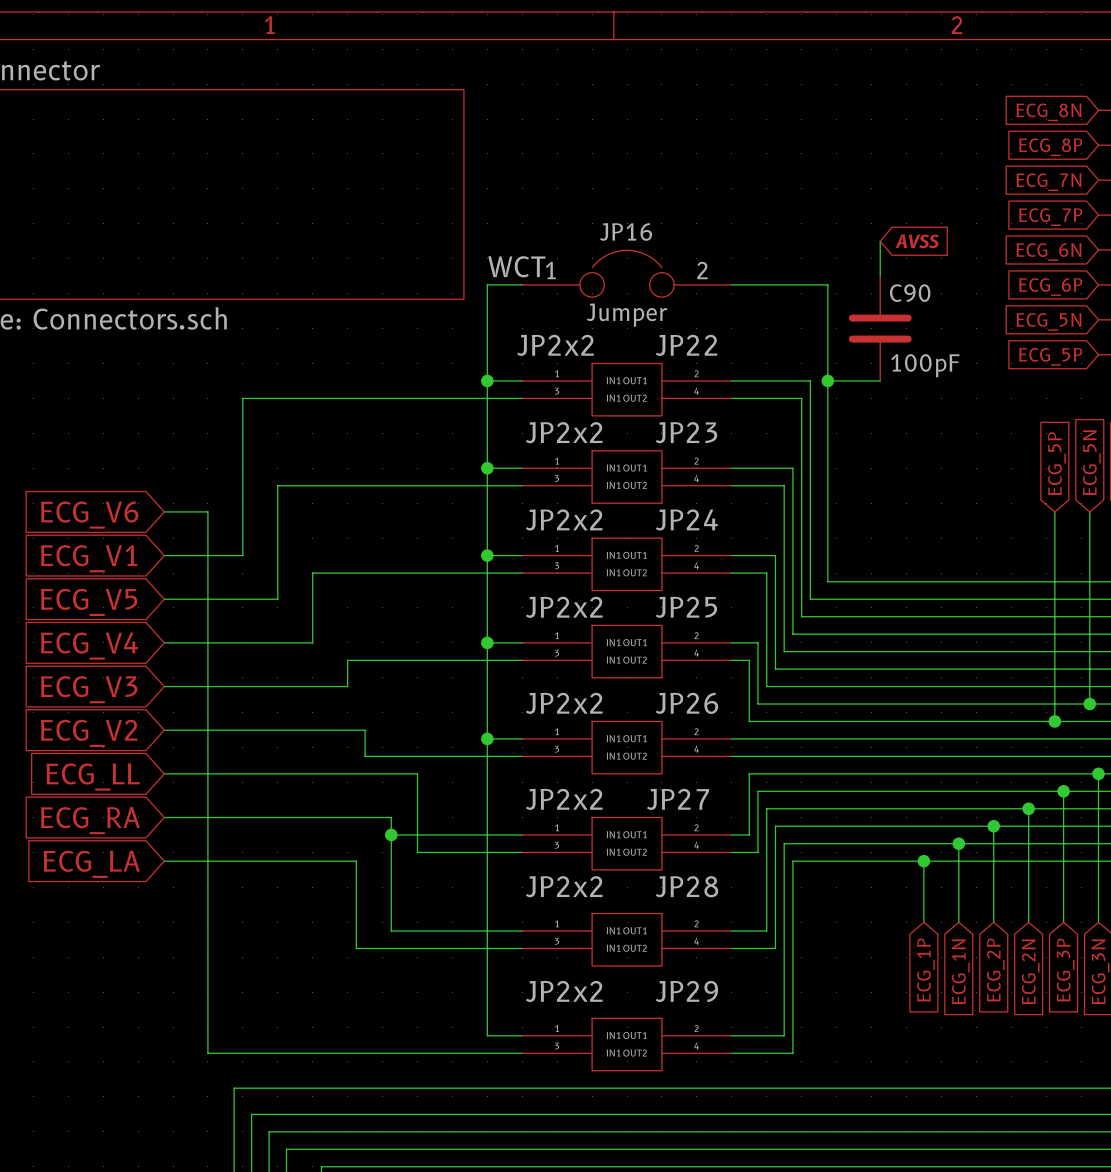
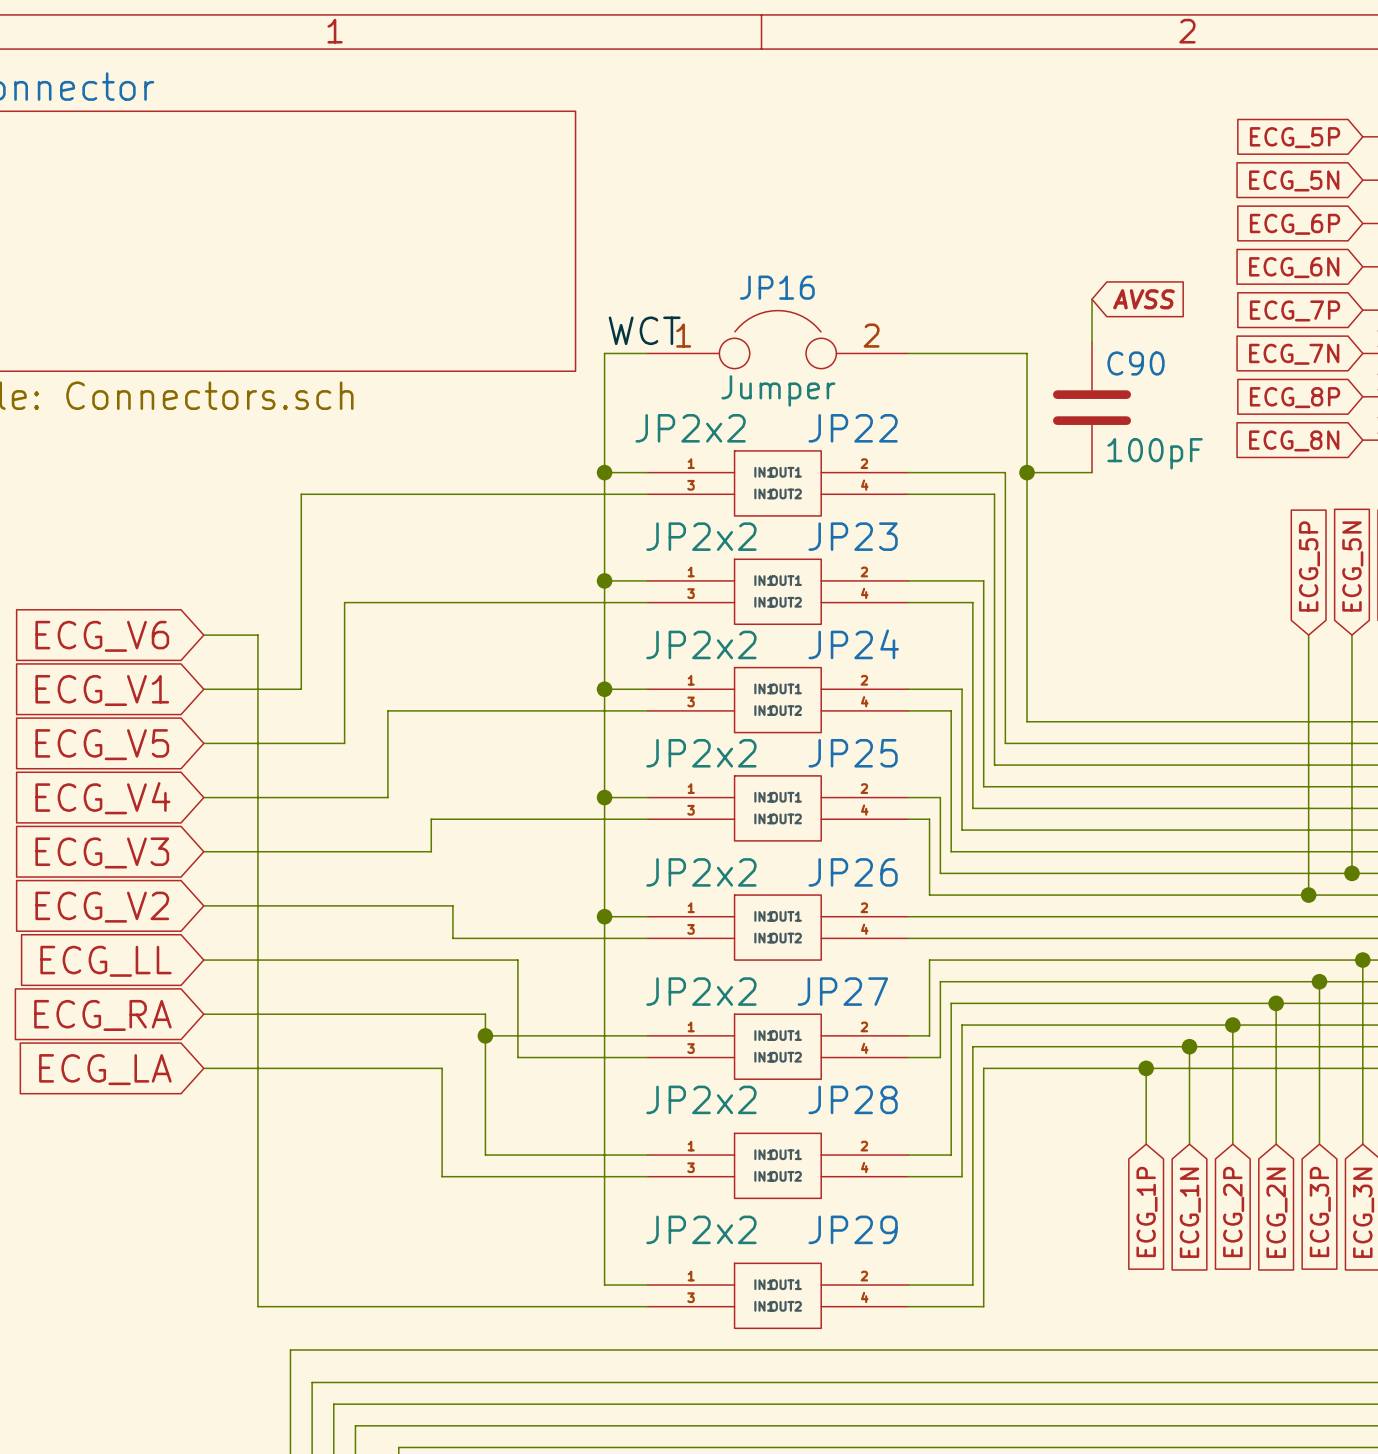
global label: ECG_8N (1048, 112) -> ECG_5P (1295, 137)
global label: ECG_8P (1050, 147) -> ECG_5N (1294, 180)
global label: ECG_7N (1048, 182) -> ECG_6P (1295, 224)
global label: ECG_7P (1050, 217) -> ECG_6N (1294, 267)
global label: ECG_6N (1048, 252) -> ECG_7P (1295, 310)
global label: ECG_6P (1050, 286) -> ECG_7N (1294, 354)
global label: ECG_5N (1048, 321) -> ECG_8P (1295, 397)
global label: ECG_5P (1050, 356) -> ECG_8N (1294, 440)

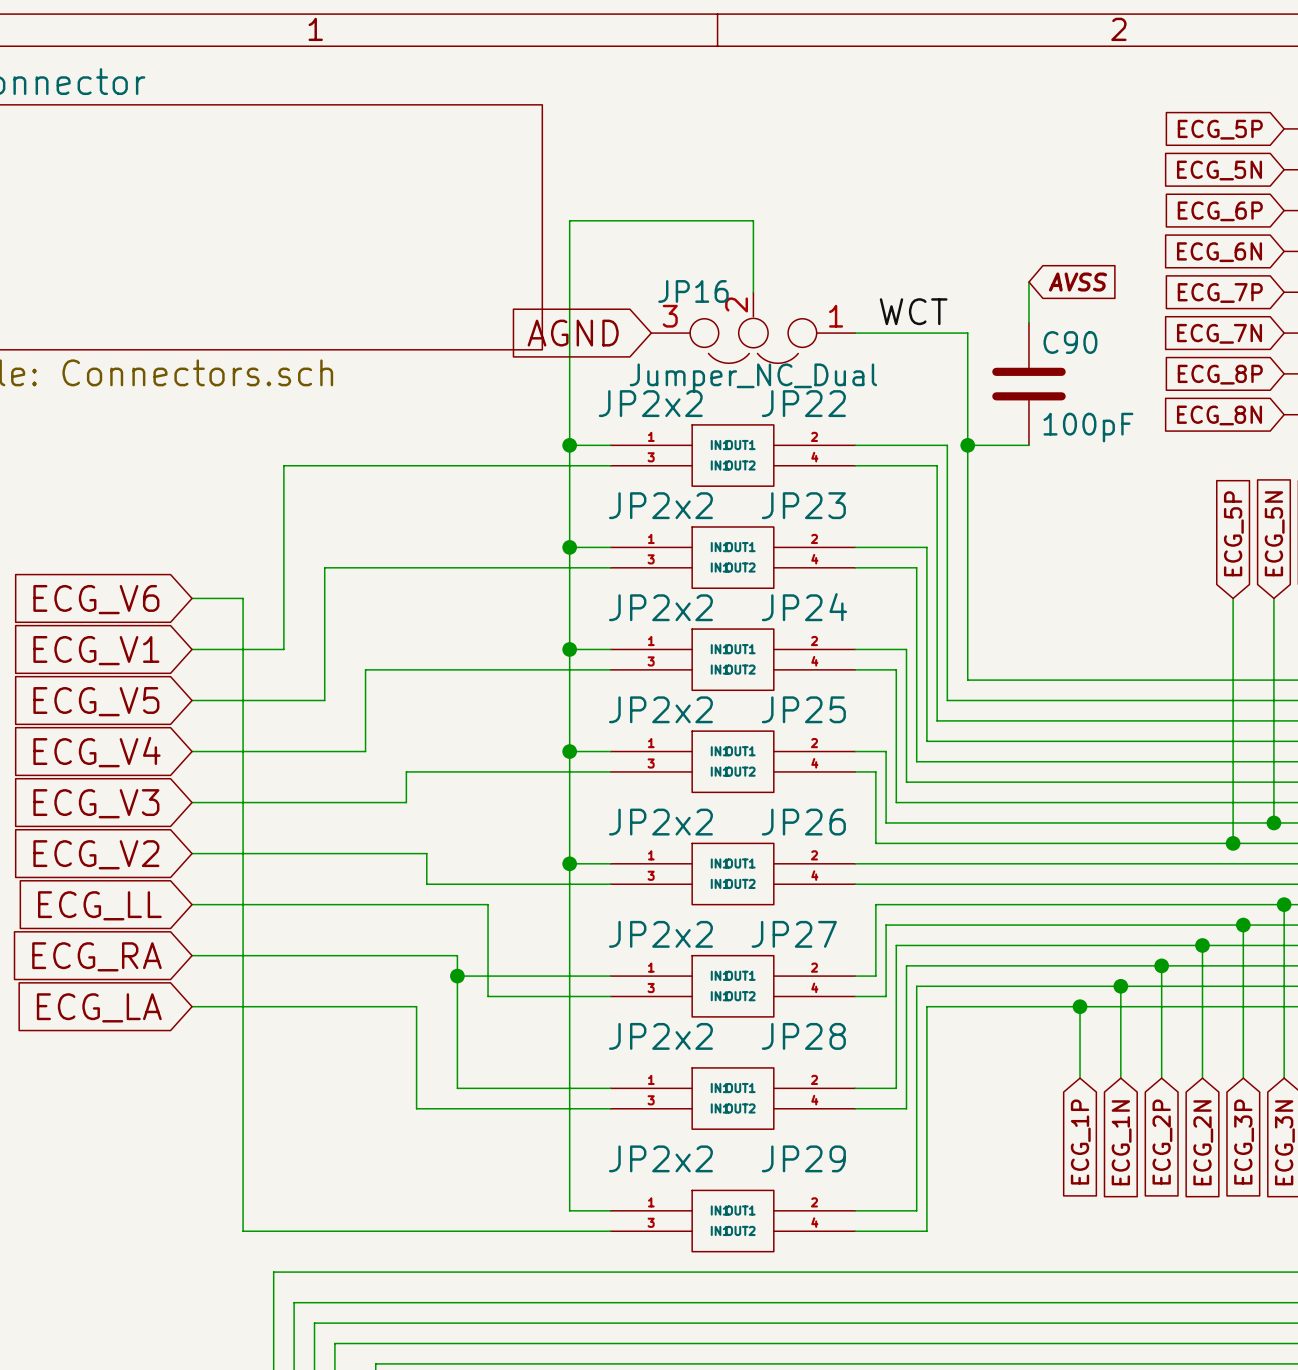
JP16 name position: JP16 (777, 287) -> JP16 (693, 291)
JP16 symbol: [647, 310, 908, 369] -> [651, 292, 856, 364]
label position: WCT (644, 330) -> WCT (913, 311)
wire: (604, 353) (647, 353) -> (569, 333) (569, 220) (753, 220) (753, 292)
global label: none -> AGND (573, 333)
JP16 value: Jumper (778, 390) -> Jumper_NC_Dual (753, 378)

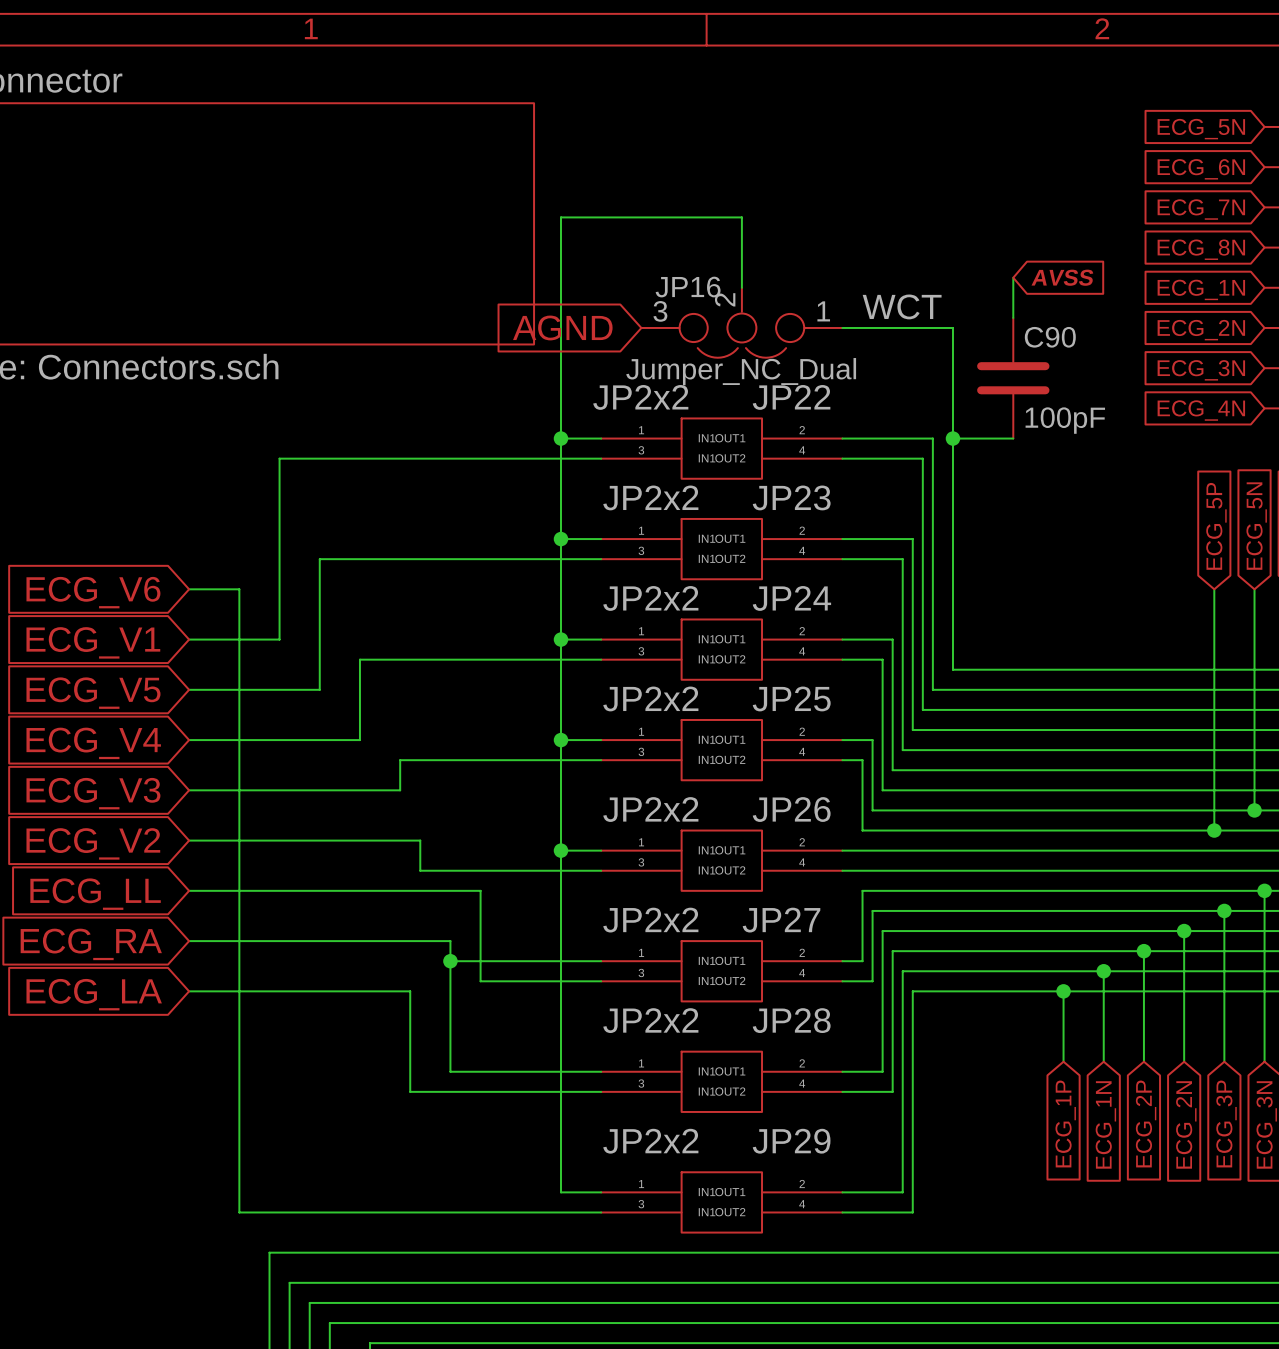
global label: ECG_5P (1220, 129) -> ECG_5N (1201, 129)
global label: ECG_5N (1219, 170) -> ECG_6N (1201, 169)
global label: ECG_6P (1220, 211) -> ECG_7N (1201, 209)
global label: ECG_6N (1219, 252) -> ECG_8N (1201, 249)
global label: ECG_7P (1220, 292) -> ECG_1N (1201, 289)
global label: ECG_7N (1219, 333) -> ECG_2N (1201, 330)
global label: ECG_8P (1220, 374) -> ECG_3N (1201, 370)
global label: ECG_8N (1219, 415) -> ECG_4N (1201, 410)

